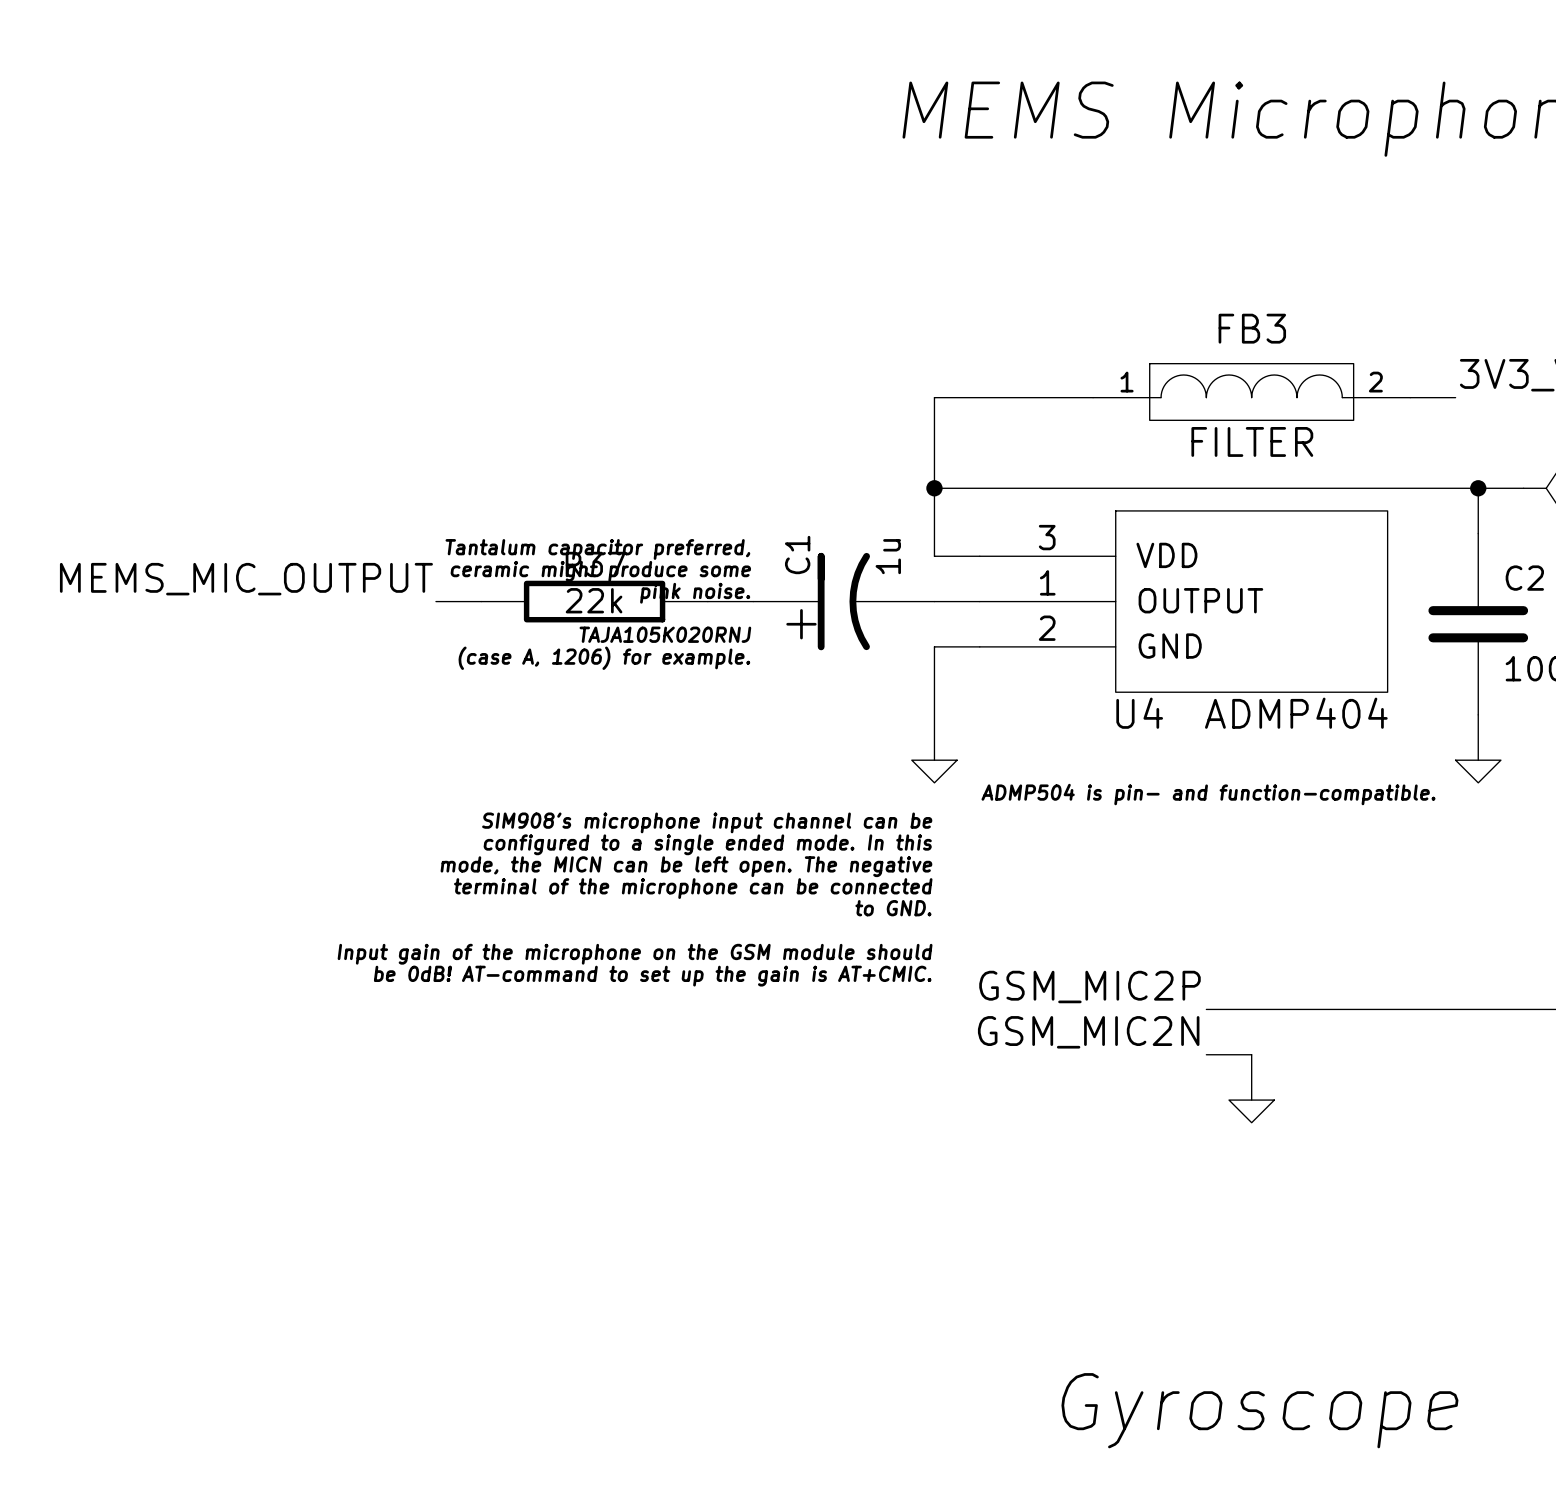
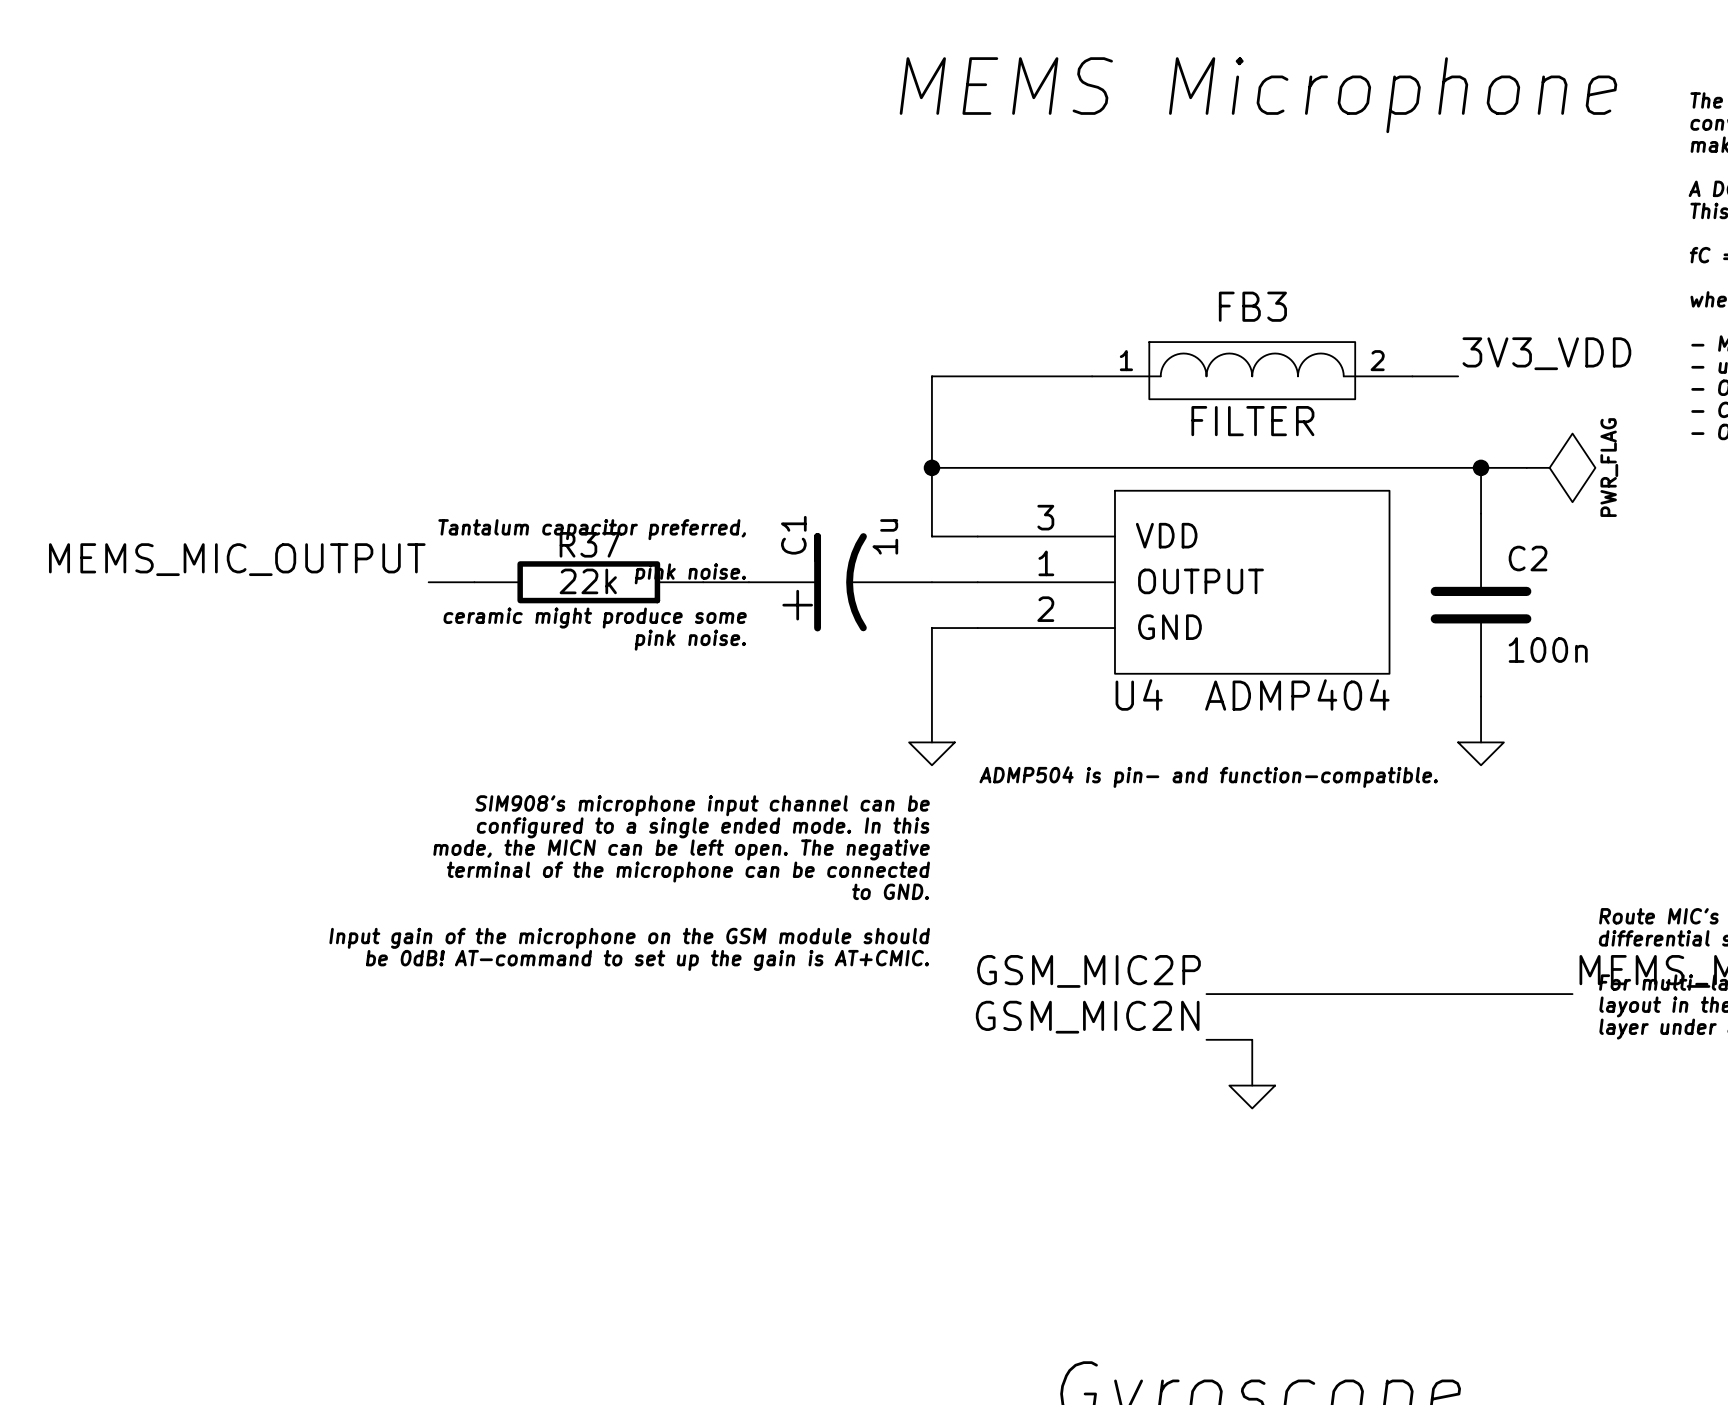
text: ceramic might produce some (600, 571) -> none
text: TAJA105K020RNJ (665, 634) -> ceramic might produce some (595, 618)
text: (case A, 1206) for example. (604, 658) -> pink noise. (690, 640)

